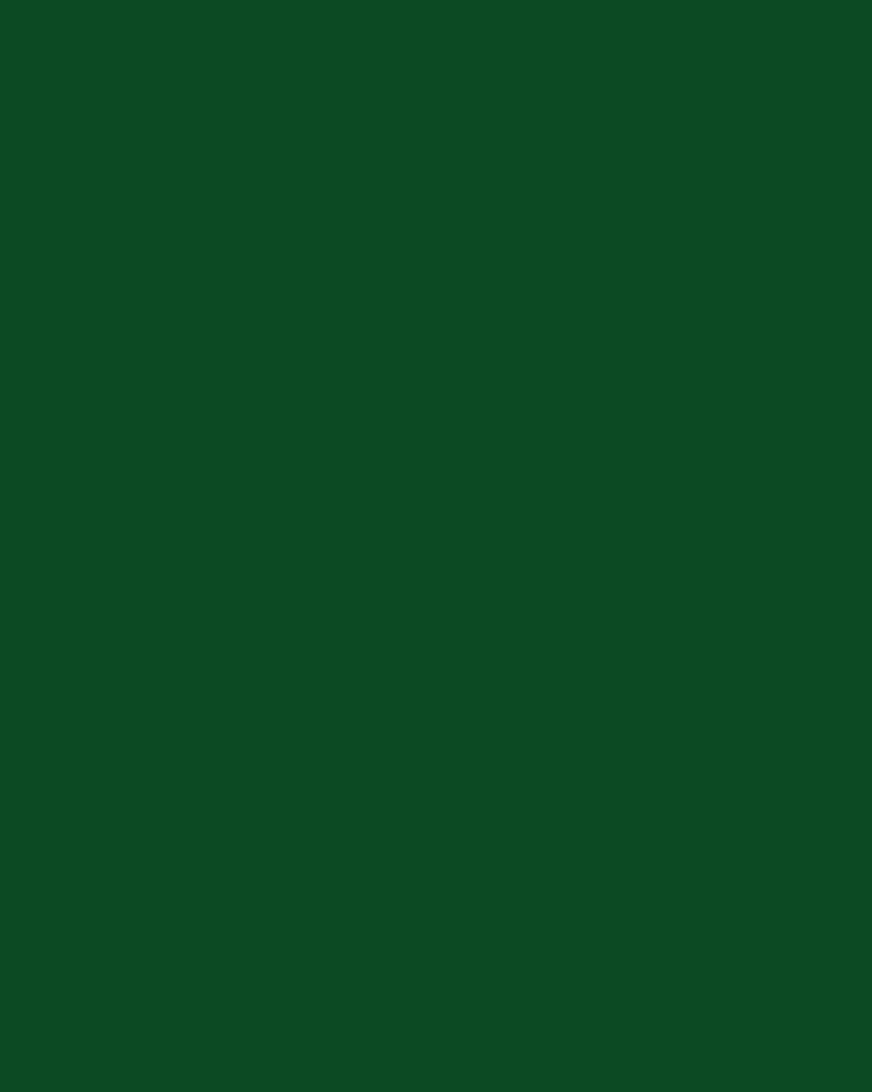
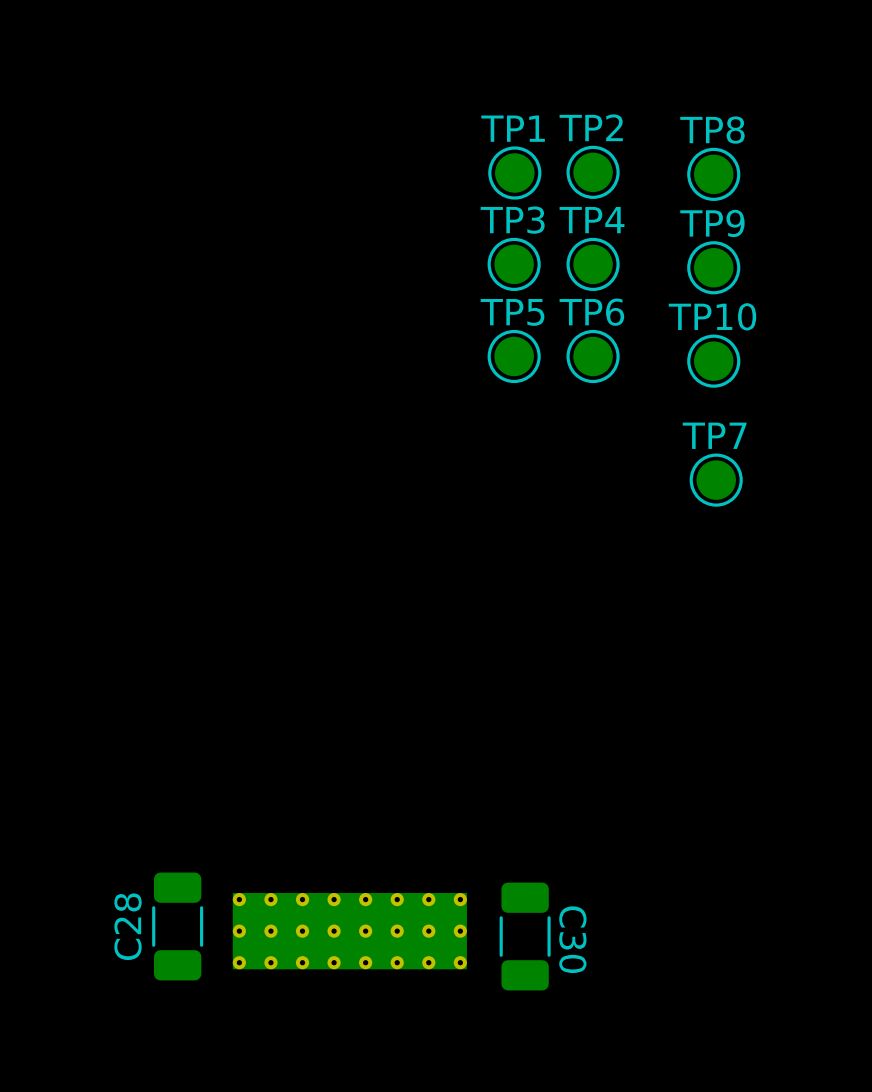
TP2: none -> (593, 172)
TP1: none -> (514, 173)
TP8: none -> (713, 174)
TP3: none -> (514, 264)
TP4: none -> (593, 264)
TP9: none -> (713, 267)
TP5: none -> (514, 356)
TP6: none -> (593, 356)
TP10: none -> (713, 361)
TP7: none -> (716, 480)
C28: none -> (177, 926)
part: none -> (349, 931)
C30: none -> (525, 936)

